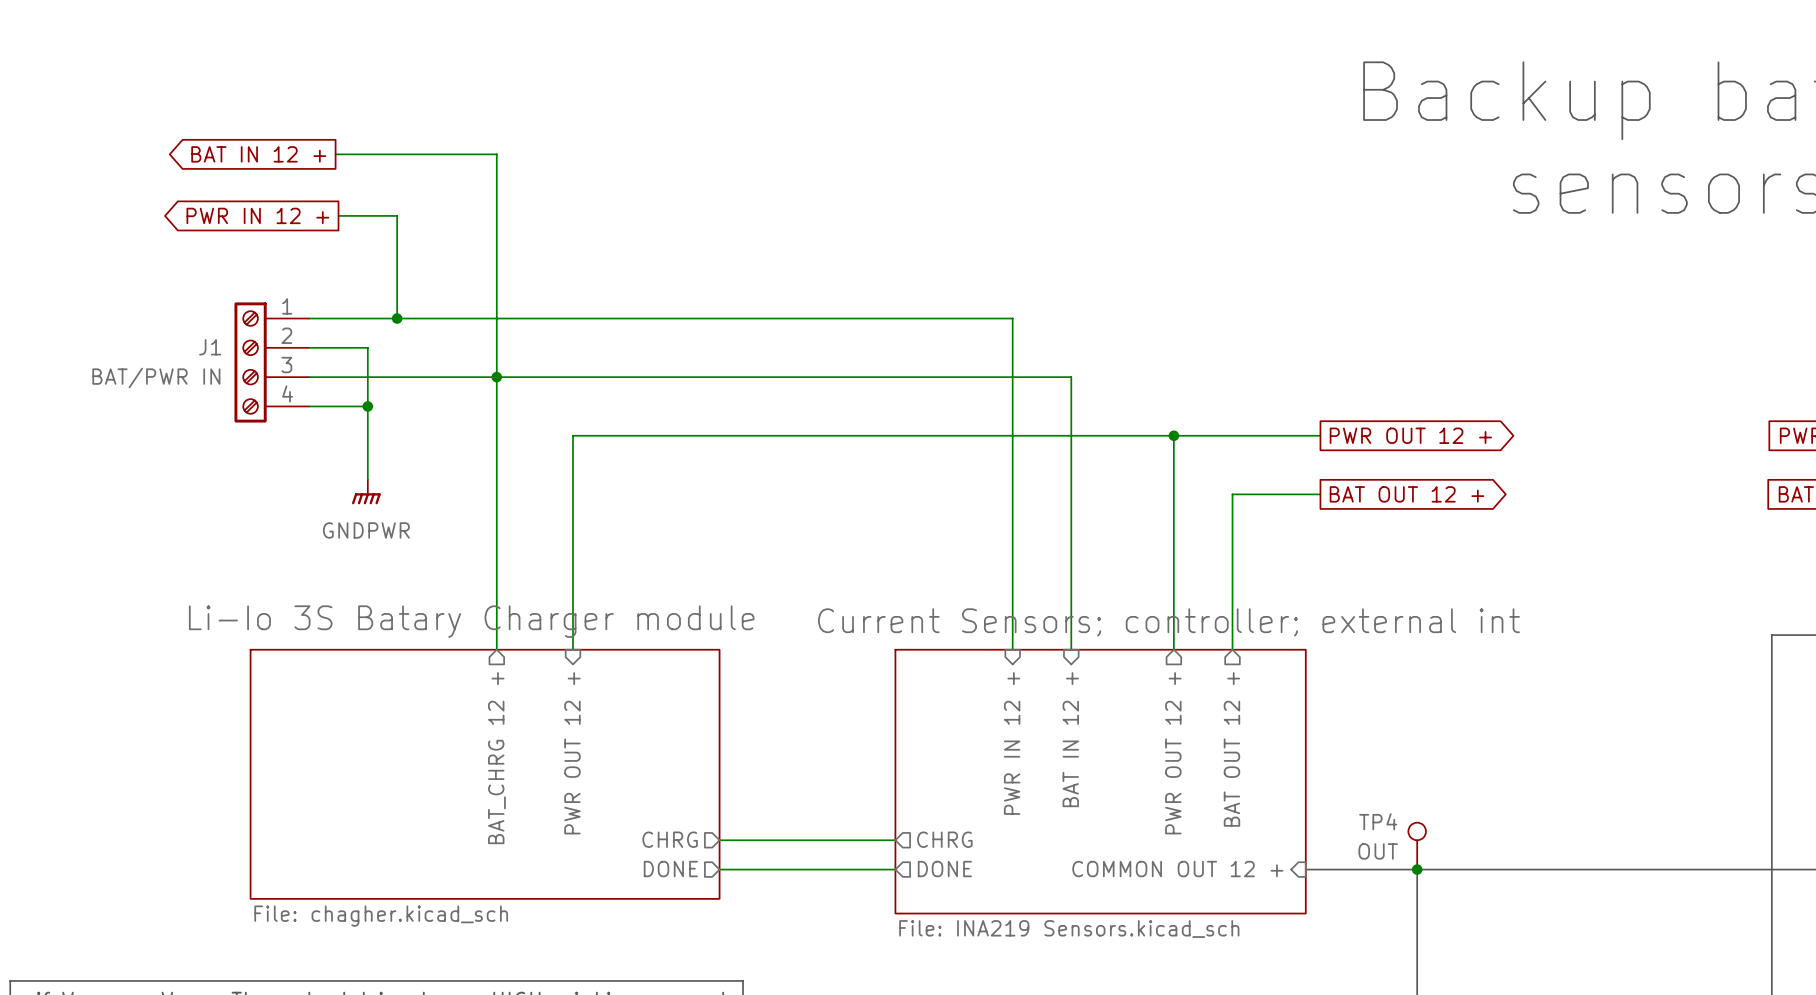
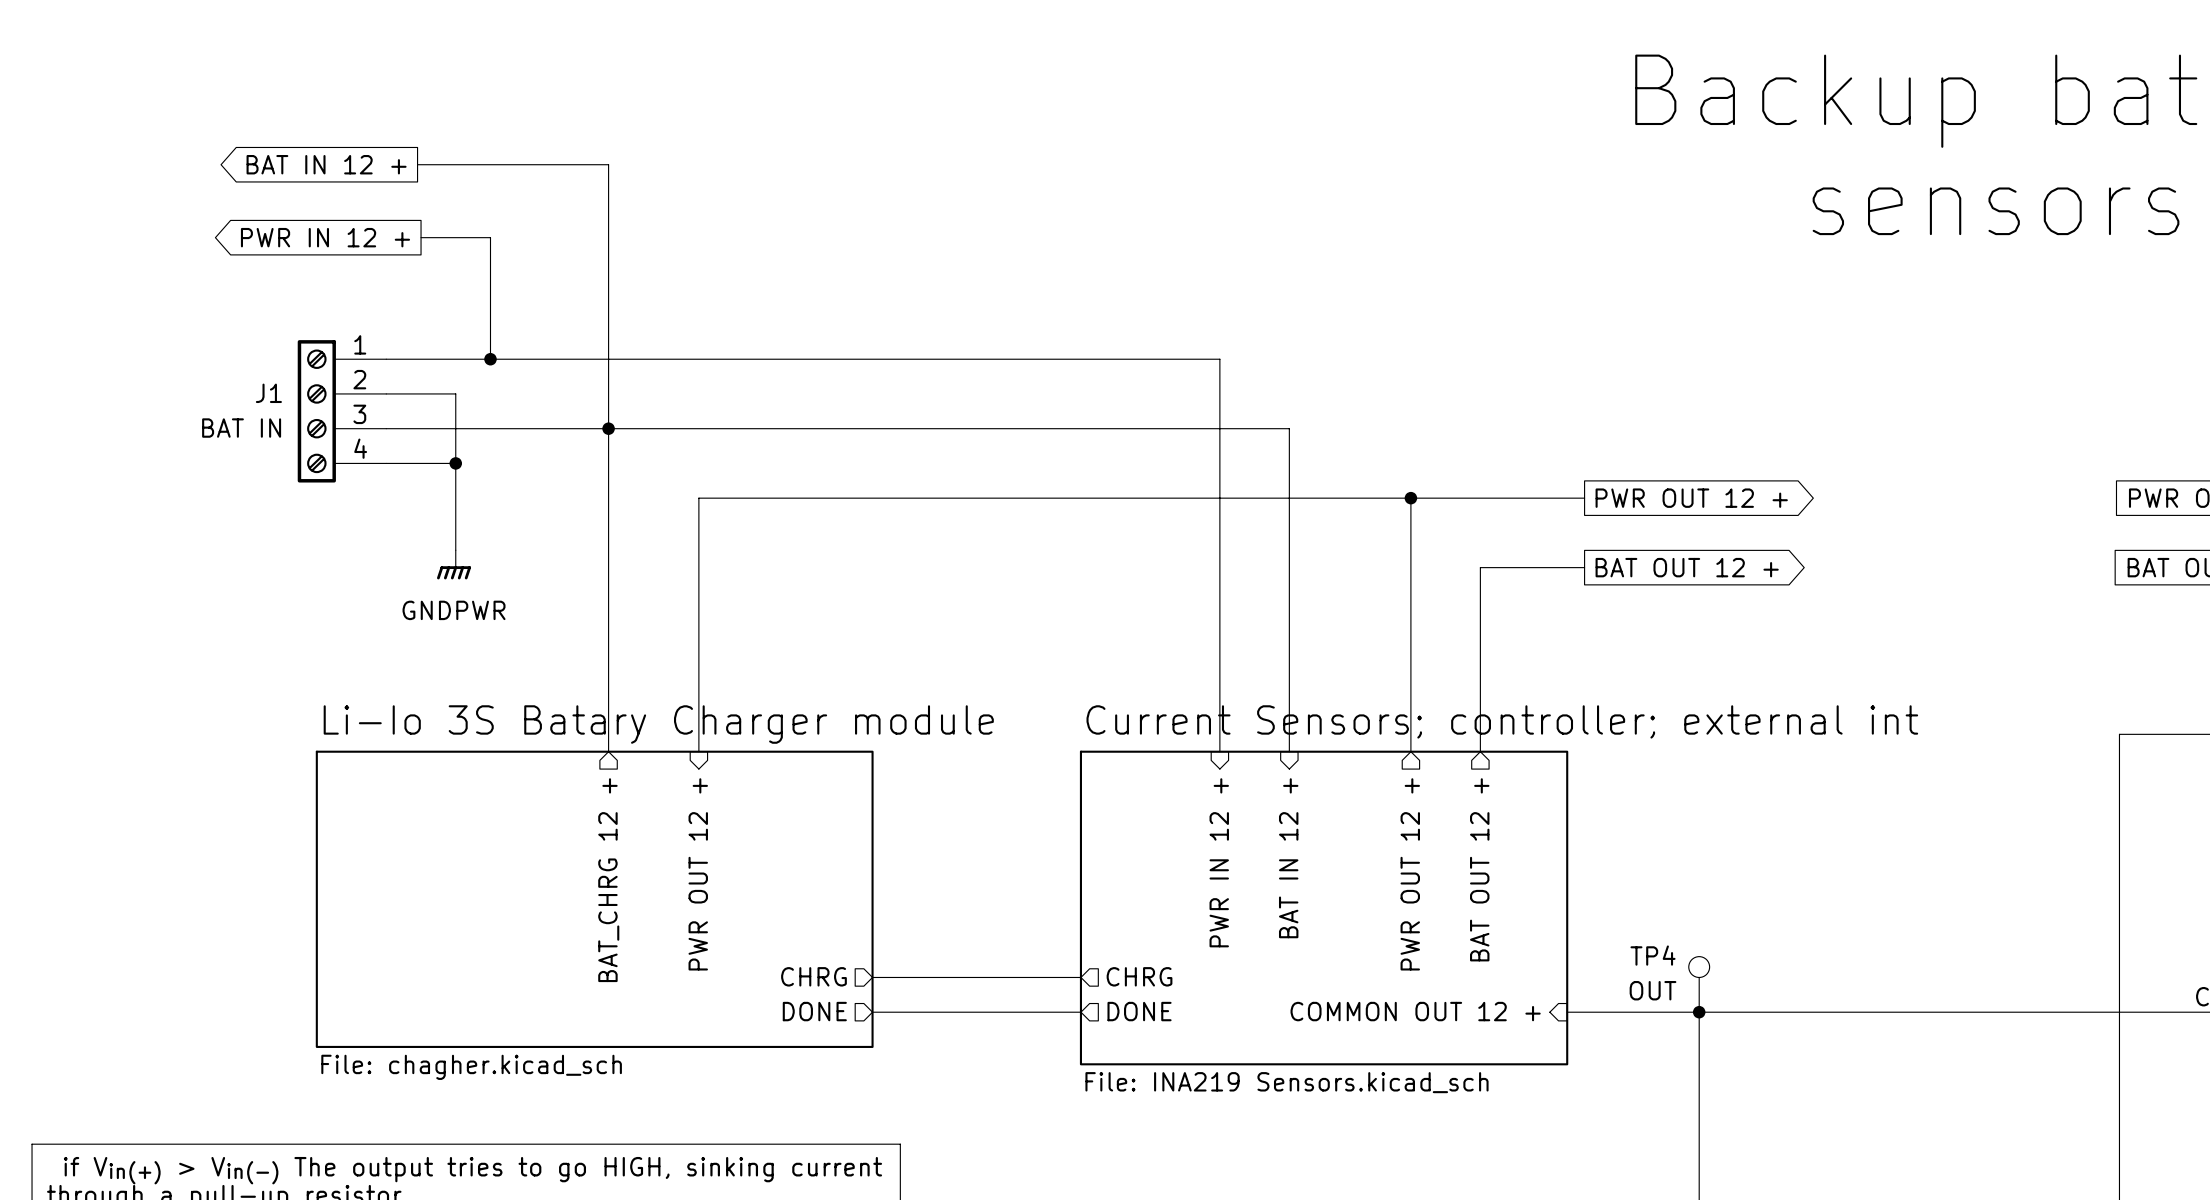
J1 value: BAT/PWR IN (156, 377) -> BAT IN (241, 428)
sheet Li-Io 3S Batary Charger module name position: Li-Io 3S Batary Charger module (471, 621) -> Li-Io 3S Batary Charger module (658, 724)
sheet Current Sensors; controller; external int name position: Current Sensors; controller; external int (1168, 622) -> Current Sensors; controller; external int (1502, 721)

